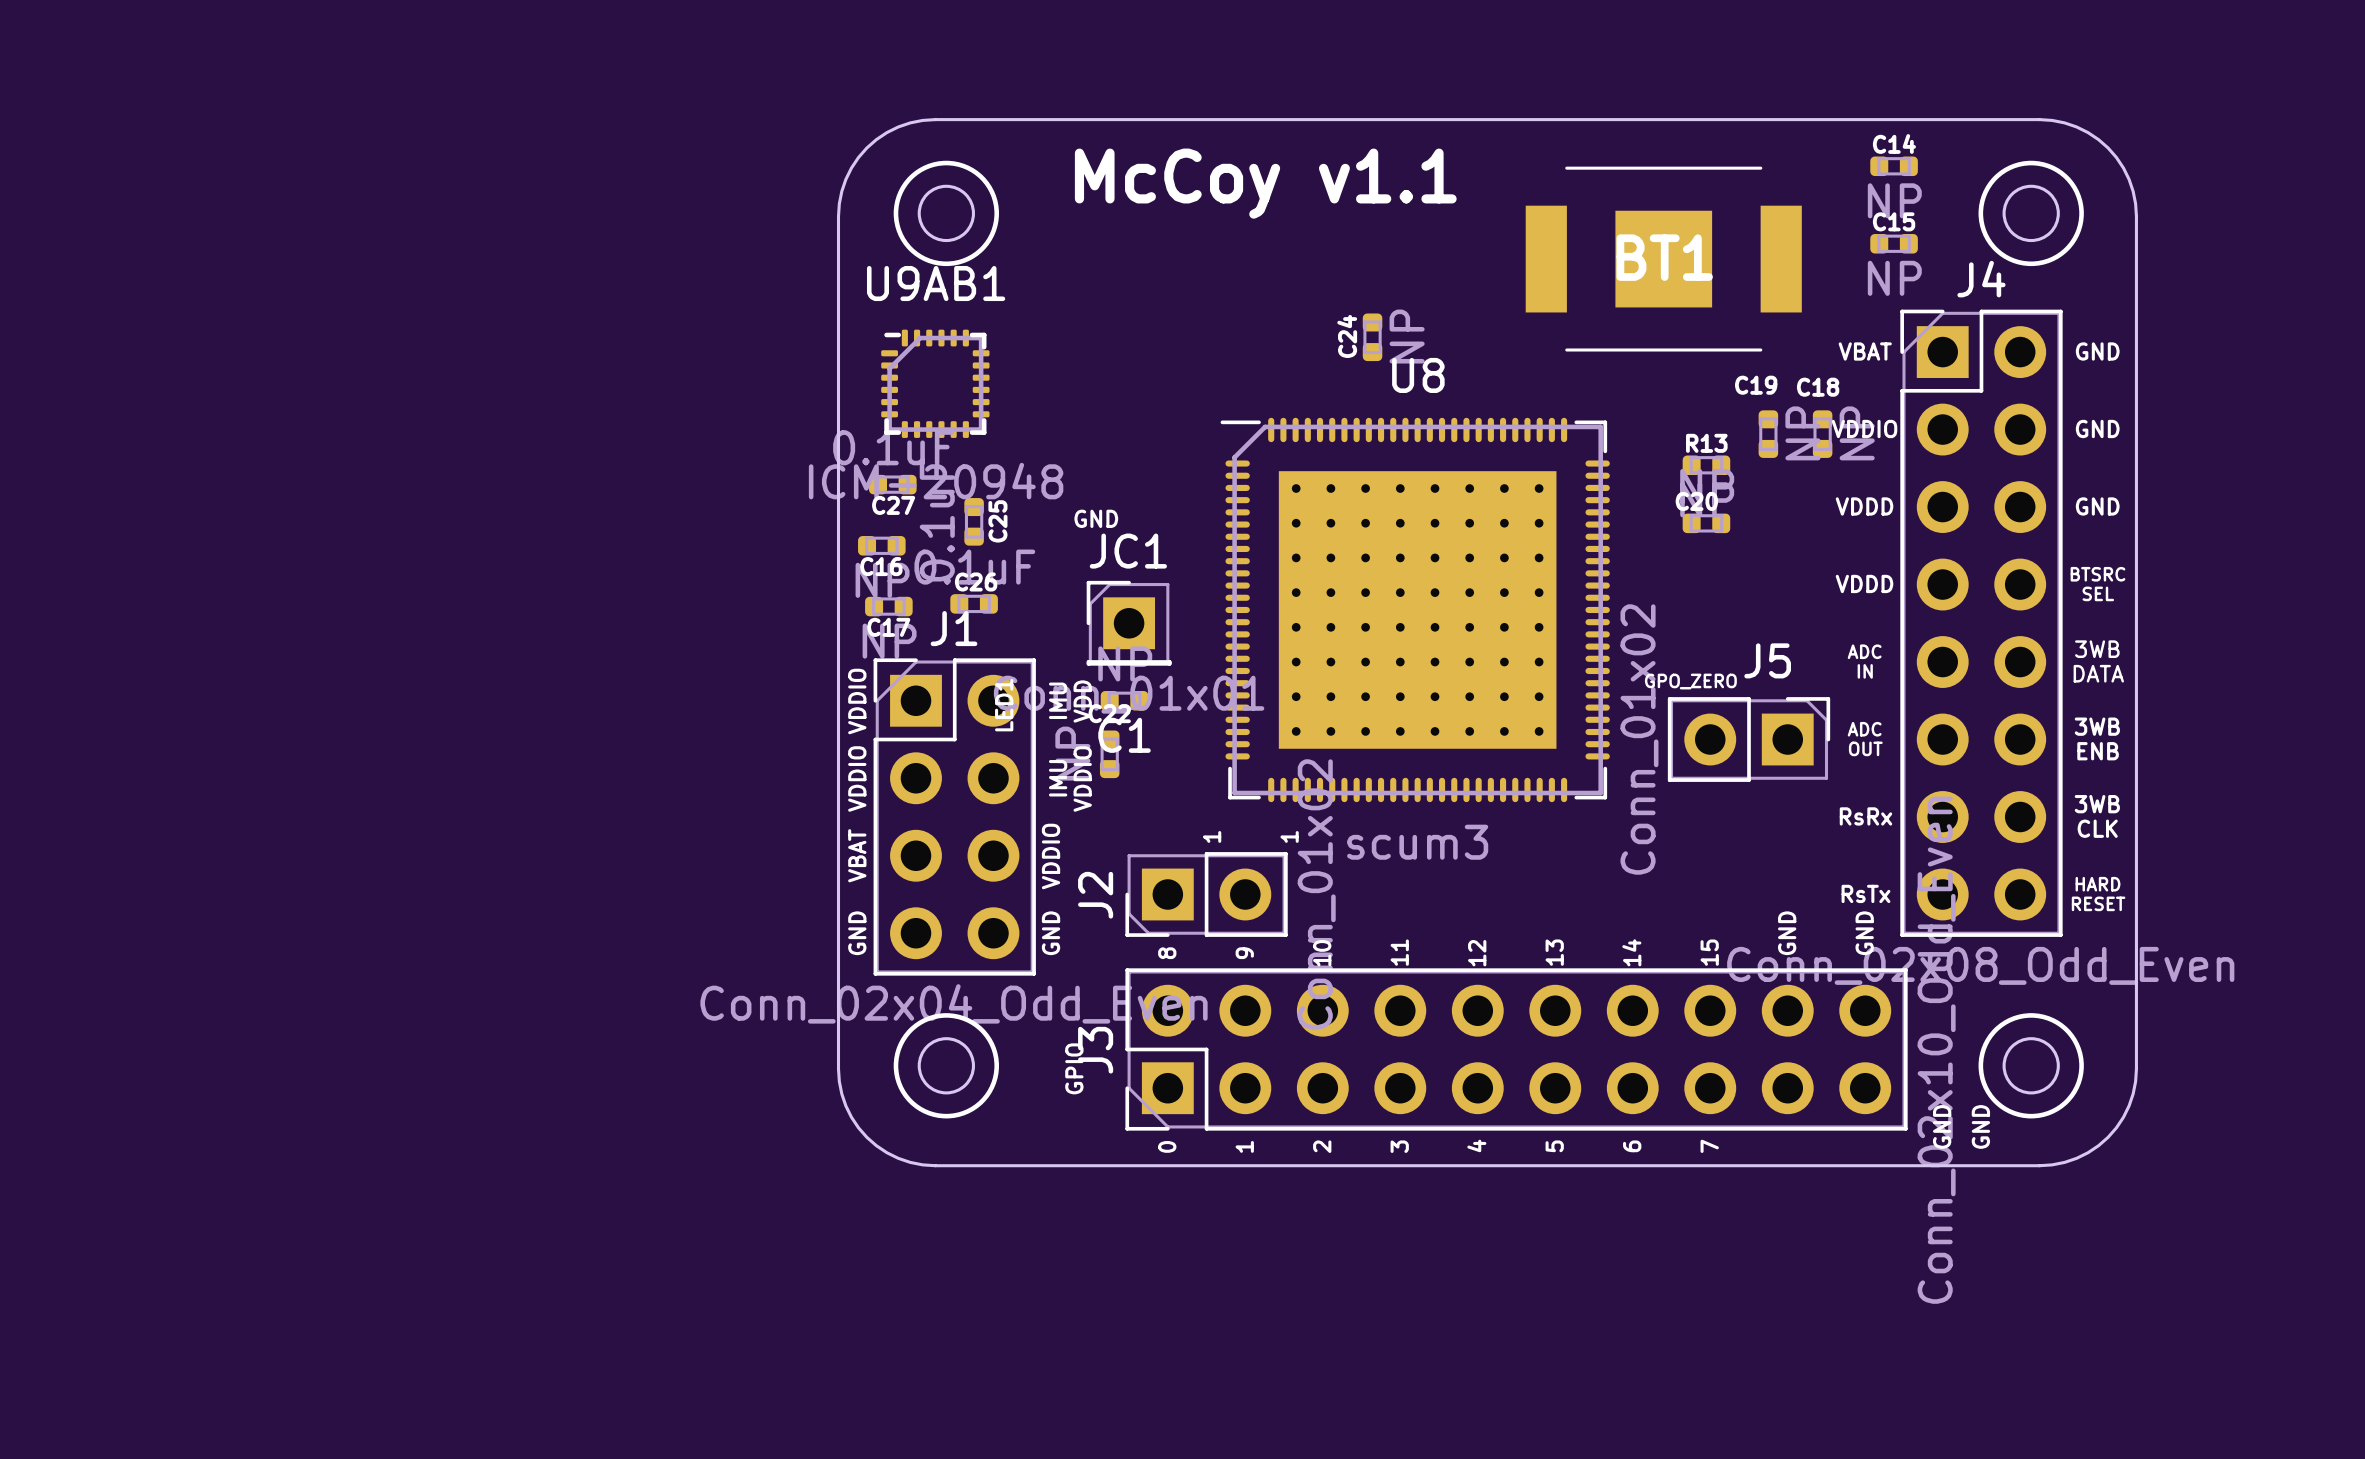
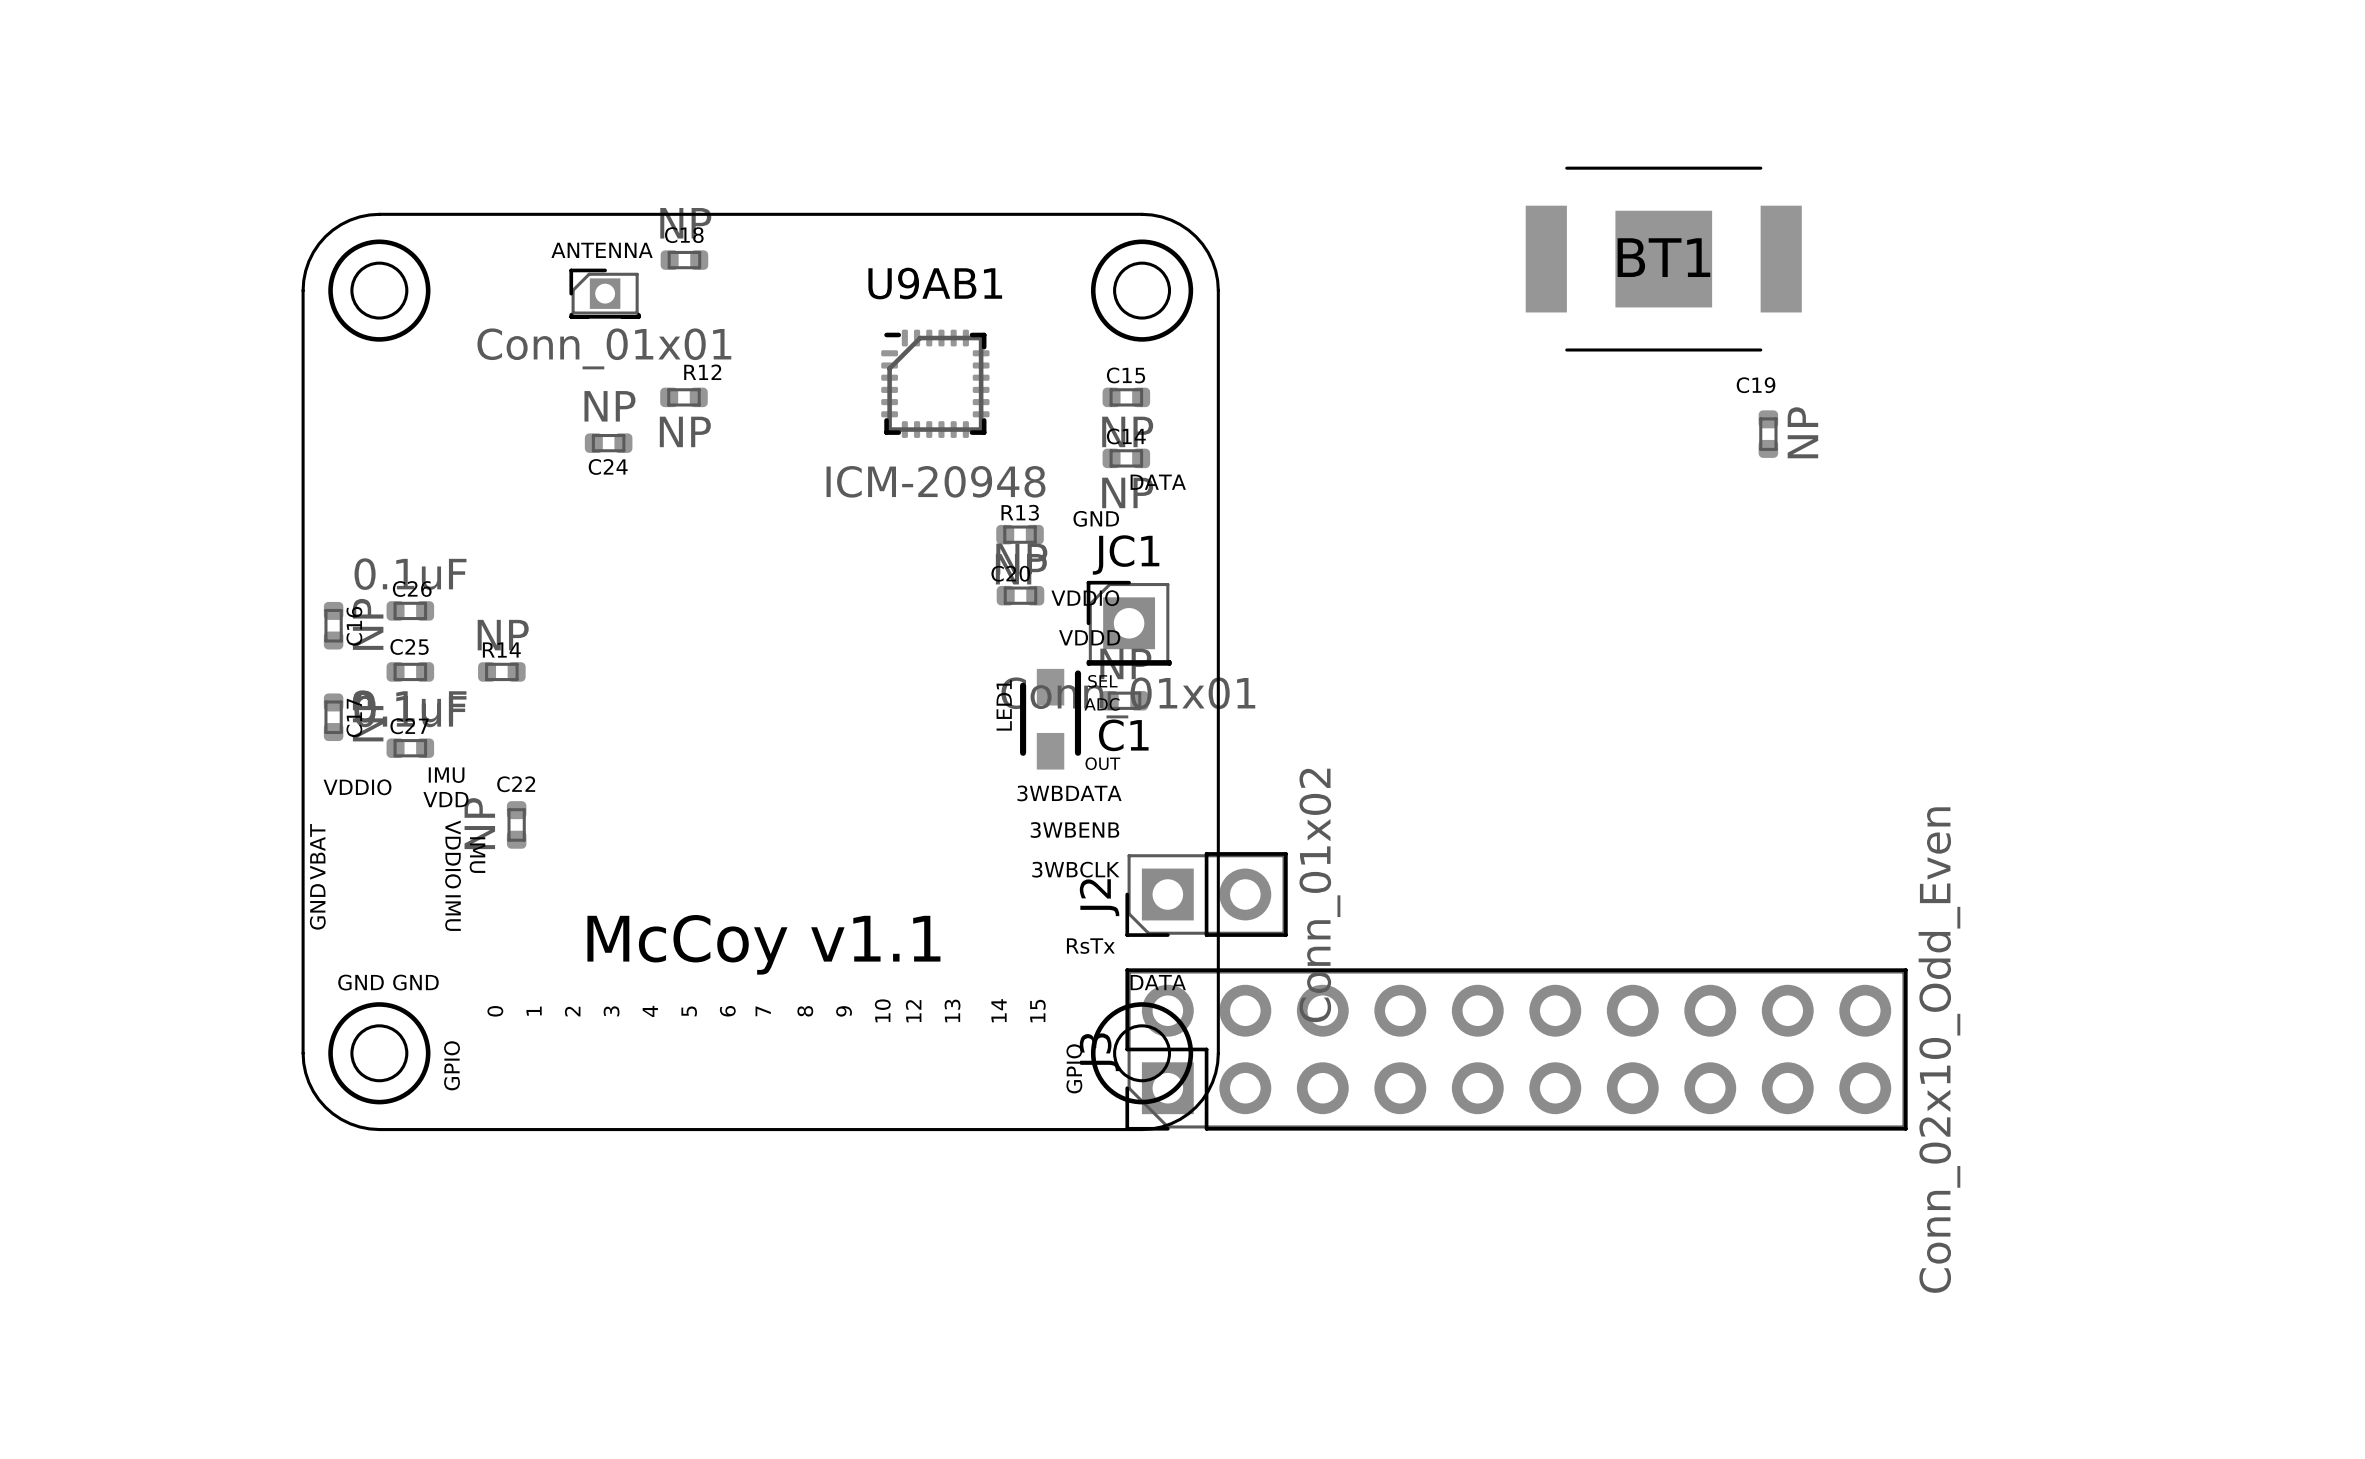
board edge: (935, 119) (2039, 119) (2064, 122) (2088, 132) (2098, 139) (2116, 157) (2129, 179) (2133, 191) (2136, 216) (2136, 1068) (2135, 1081) (2129, 1105) (2116, 1127) (2098, 1145) (2076, 1158) (2064, 1162) (2039, 1165) (935, 1165) (910, 1162) (898, 1158) (876, 1145) (858, 1127) (845, 1105) (841, 1093) (838, 1068) (838, 216) (841, 191) (845, 179) (858, 157) (866, 147) (876, 139) (898, 126) (910, 122) (935, 119) -> none
drawing: [893, 160, 1000, 267] -> none
drawing: [1978, 160, 2084, 267] -> none
C14 position: (1894, 166) -> (1126, 458)
text: McCoy v1.1 (1265, 183) -> none
round board edge: [917, 184, 975, 243] -> none
round board edge: [2002, 184, 2060, 243] -> none
board edge: none -> (379, 214) (1142, 214) (1171, 220) (1195, 236) (1212, 261) (1218, 290) (1218, 1053) (1212, 1082) (1195, 1107) (1171, 1123) (1142, 1129) (379, 1129) (350, 1123) (325, 1107) (308, 1082) (303, 1053) (303, 290) (308, 261) (325, 236) (350, 220) (379, 214)
drawing: none -> [328, 239, 431, 342]
drawing: none -> [1090, 239, 1194, 342]
C15 position: (1894, 243) -> (1126, 397)
round board edge: none -> [350, 261, 409, 320]
round board edge: none -> [1113, 261, 1172, 320]
ANTENNA: none -> Conn_01x01 (605, 293)
C24 rotation: 0° (1372, 337) -> 90° clockwise (608, 443)
C24 position: (1372, 337) -> (608, 443)
text: VBAT (1865, 351) -> none
text: GND (2097, 351) -> none
R12: none -> NP (683, 397)
text: VDDIO (1864, 428) -> none
text: GND (2097, 428) -> none
C18 rotation: 0° (1822, 434) -> 90° clockwise (684, 260)
C18 position: (1822, 434) -> (684, 260)
R13 position: (1706, 465) -> (1020, 534)
text: none -> DATA (1158, 482)
C27 position: (892, 484) -> (410, 748)
C27 name position: C27 (893, 505) -> C27 (409, 726)
text: VDDD (1864, 506) -> none
text: GND (2097, 506) -> none
C25 rotation: 0° (974, 521) -> 90° clockwise (410, 671)
C25 position: (974, 521) -> (410, 671)
C20 position: (1706, 523) -> (1020, 595)
C16 rotation: 0° (881, 545) -> 90° clockwise (333, 625)
C16 position: (881, 545) -> (333, 625)
text: BTSRC (2098, 574) -> none
text: VDDD (1864, 583) -> none
text: SEL (2098, 593) -> none
text: none -> VDDIO (1085, 598)
C26 position: (974, 603) -> (410, 610)
C17 rotation: 0° (888, 606) -> 90° clockwise (333, 717)
C17 position: (888, 606) -> (333, 717)
U8: scum3 (1415, 609) -> none
J4: Conn_02x08_Odd_Even (1981, 623) -> none
text: none -> VDDD (1089, 637)
text: 3WB (2097, 649) -> none
text: ADC (1864, 651) -> none
R14: none -> NP (501, 671)
text: IN (1865, 671) -> none
text: DATA (2098, 673) -> none
text: none -> SEL (1102, 681)
text: GPO_ZERO (1690, 681) -> none
text: IMU (1058, 700) -> none
text: VDDIO (857, 701) -> none
text rotation: 0° (1082, 701) -> 90° clockwise (445, 799)
text position: VDD (1082, 701) -> VDD (445, 799)
text: none -> ADC (1102, 704)
part: none -> (1050, 719)
text: 3WB (2097, 726) -> none
text: ADC (1864, 729) -> none
J5: Conn_01x02 (1749, 739) -> none
text: OUT (1865, 748) -> none
text: ENB (2098, 751) -> none
C22 position: (1109, 754) -> (516, 824)
text: none -> OUT (1102, 763)
text: none -> IMU (446, 775)
text: VDDIO (857, 778) -> none
text: IMU (1058, 778) -> none
text: VDDIO (1082, 778) -> none
text: none -> VDDIO (357, 787)
text: none -> 3WBDATA (1069, 793)
text: 3WB (2097, 804) -> none
text: RsRx (1865, 816) -> none
J1: Conn_02x04_Odd_Even (954, 817) -> none
text: CLK (2097, 828) -> none
text: none -> 3WBENB (1074, 830)
text: 1 (1212, 836) -> none
text: 1 (1289, 836) -> none
text: none -> VDDIO (453, 854)
text: none -> IMU (477, 855)
text position: VBAT (857, 855) -> VBAT (317, 851)
text: VDDIO (1051, 856) -> none
text: none -> 3WBCLK (1075, 869)
text: HARD (2098, 884) -> none
text: RsTx (1865, 893) -> none
text: RESET (2098, 903) -> none
text: none -> GND (317, 906)
text: none -> IMU (453, 913)
text: GND (857, 933) -> none
text: GND (1051, 933) -> none
text: GND (1787, 933) -> none
text: GND (1864, 933) -> none
text: none -> RsTx (1090, 946)
text: none -> McCoy v1.1 (763, 944)
text: 11 (1399, 952) -> none
text position: 13 (1554, 952) -> 13 (952, 1011)
text position: 14 (1631, 952) -> 14 (999, 1010)
text position: 15 (1709, 952) -> 15 (1037, 1011)
text position: 8 (1167, 953) -> 8 (805, 1011)
text position: 9 (1244, 953) -> 9 (844, 1011)
text position: 10 (1322, 953) -> 10 (882, 1010)
text position: 12 (1477, 953) -> 12 (913, 1011)
text: none -> GND (361, 982)
text: none -> GND (415, 982)
text: none -> DATA (1158, 982)
drawing: none -> [328, 1002, 431, 1105]
drawing: none -> [1090, 1002, 1194, 1105]
text: none -> 4 (650, 1011)
text: none -> 1 (534, 1011)
text: none -> 3 (611, 1011)
text: none -> 5 (689, 1011)
text: none -> 6 (727, 1011)
text: none -> 7 (763, 1011)
drawing: [893, 1013, 1000, 1119] -> none
drawing: [1978, 1013, 2084, 1119] -> none
round board edge: none -> [350, 1024, 409, 1083]
round board edge: none -> [1113, 1024, 1172, 1083]
round board edge: [917, 1037, 975, 1095] -> none
round board edge: [2002, 1037, 2060, 1095] -> none
text: none -> GPIO (452, 1065)
text: GND (1942, 1126) -> none
text: GND (1980, 1126) -> none
text: 4 (1476, 1145) -> none
text position: 0 (1167, 1146) -> 0 (495, 1011)
text: 1 (1244, 1146) -> none
text position: 2 (1322, 1146) -> 2 (572, 1011)
text: 3 (1399, 1146) -> none
text: 5 (1554, 1146) -> none
text: 6 (1632, 1146) -> none
text: 7 (1709, 1146) -> none

